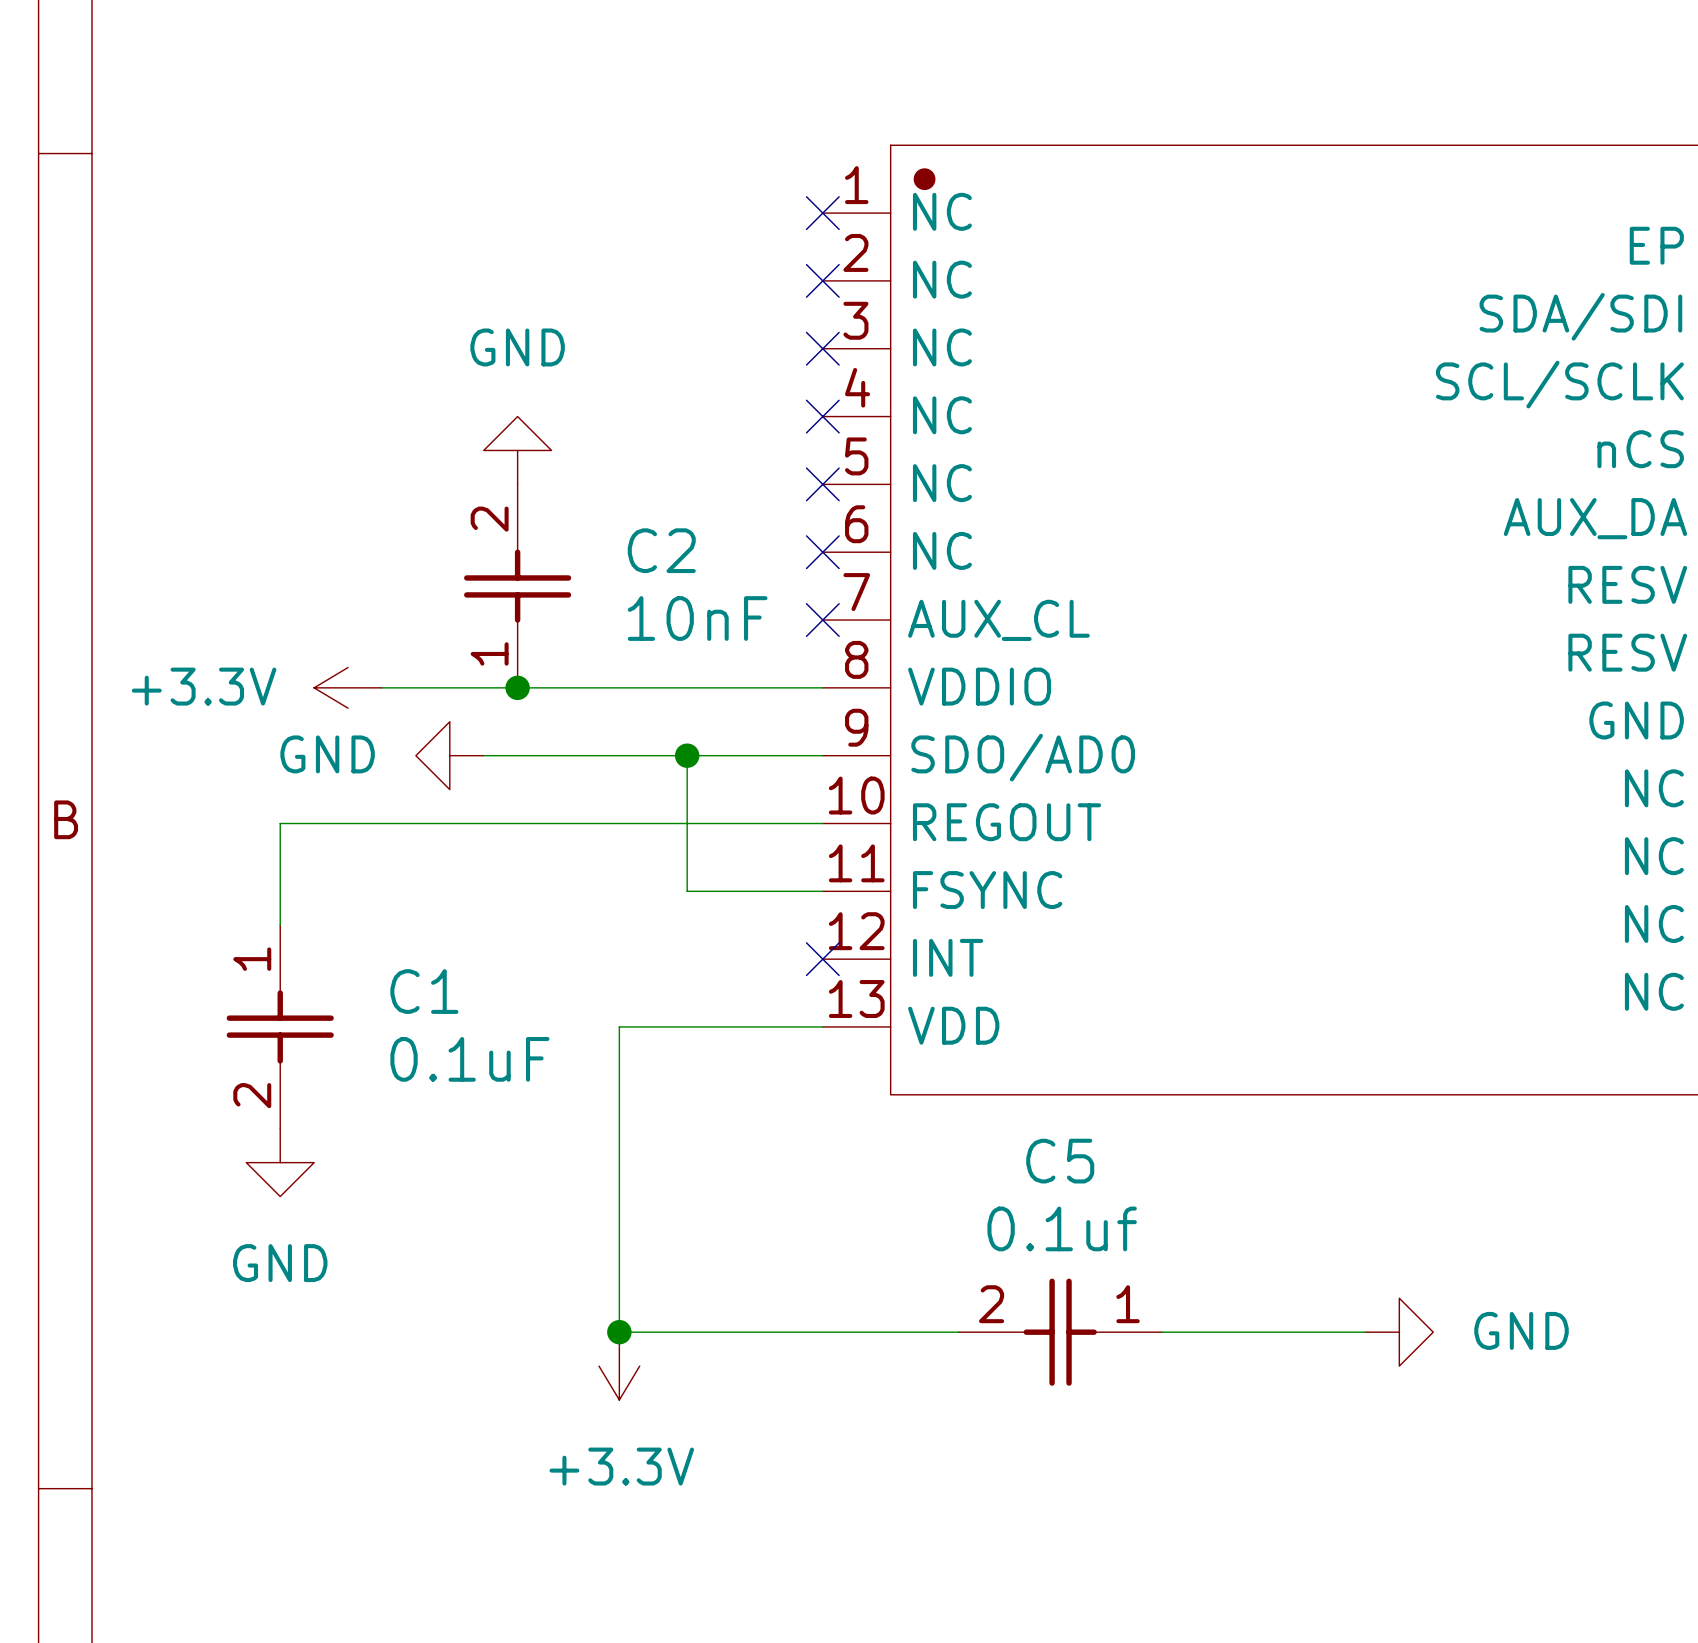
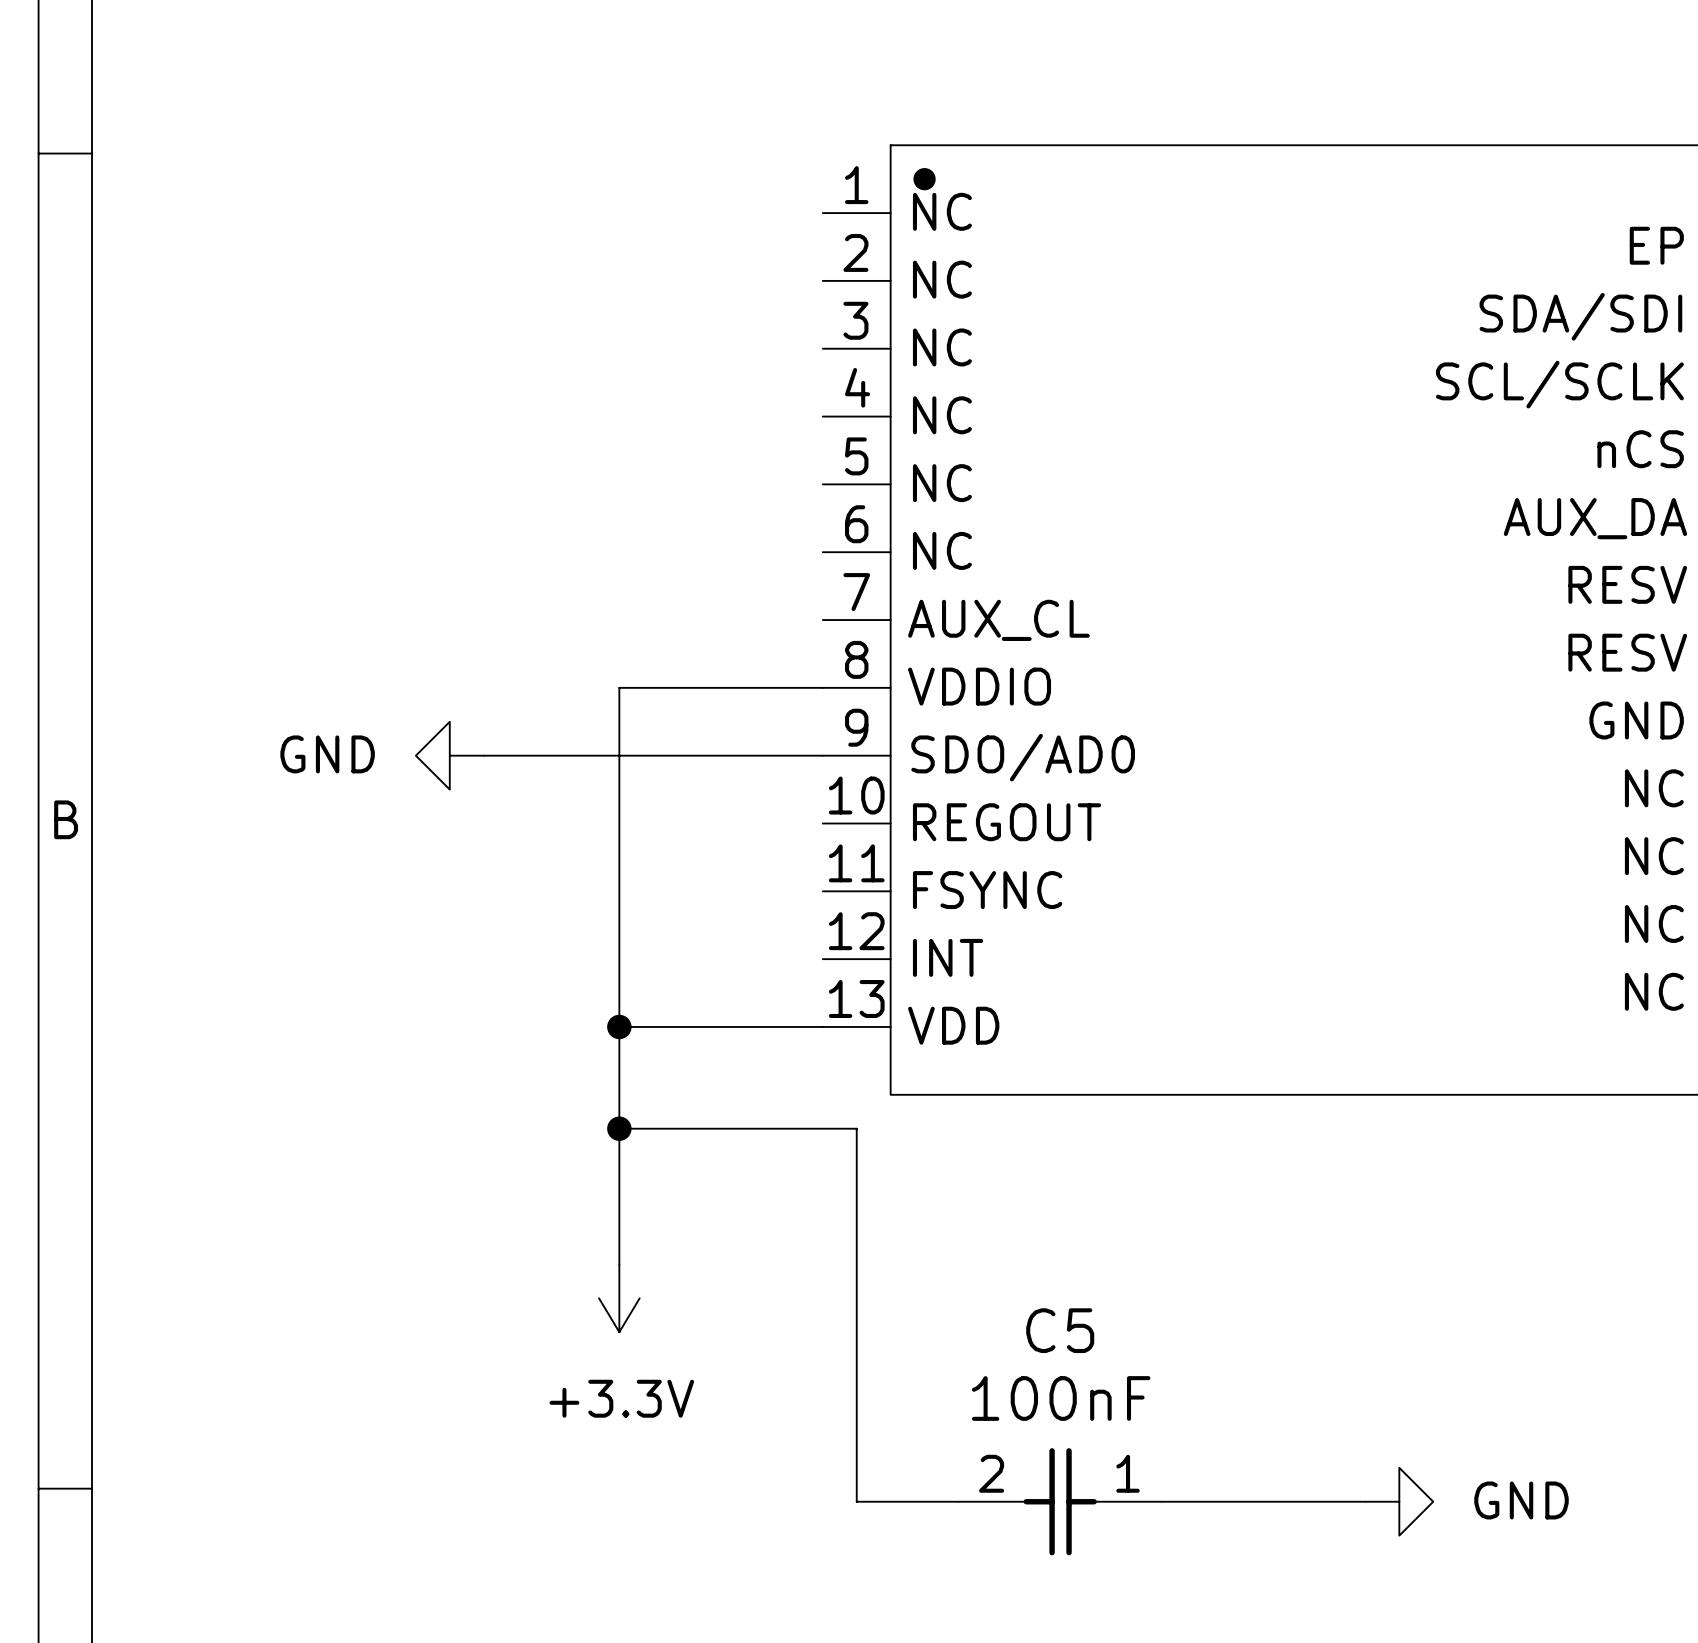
no-connect mark: (822, 213) -> none
no-connect mark: (822, 280) -> none
no-connect mark: (822, 348) -> none
no-connect mark: (822, 416) -> none
power symbol: GND (517, 450) -> none
no-connect mark: (822, 484) -> none
no-connect mark: (822, 552) -> none
C2: 10nF (517, 586) -> none
no-connect mark: (822, 620) -> none
power symbol: +3.3V (348, 687) -> none
wire: (381, 687) (619, 687) -> (619, 1026) (619, 687)
junction: (517, 687) -> none
wire: (687, 755) (687, 891) (822, 891) -> none
junction: (687, 755) -> none
wire: (822, 823) (280, 823) (280, 925) -> none
no-connect mark: (822, 959) -> none
C1: 0.1uF (280, 1026) -> none
junction: none -> (619, 1026)
wire: none -> (619, 1128) (856, 1128) (856, 1501) (958, 1501)
junction: none -> (619, 1128)
power symbol: GND (280, 1162) -> none
C5 value: 0.1uf (1062, 1228) -> 100nF (1061, 1398)
wire: (619, 1264) (619, 1332) (958, 1332) -> none
junction: (619, 1332) -> none
C5 position: (1060, 1332) -> (1060, 1501)
wire: (1161, 1332) (1365, 1332) -> (1161, 1501) (1365, 1501)
power symbol position: GND (1399, 1332) -> GND (1399, 1501)
power symbol position: +3.3V (619, 1366) -> +3.3V (619, 1298)

